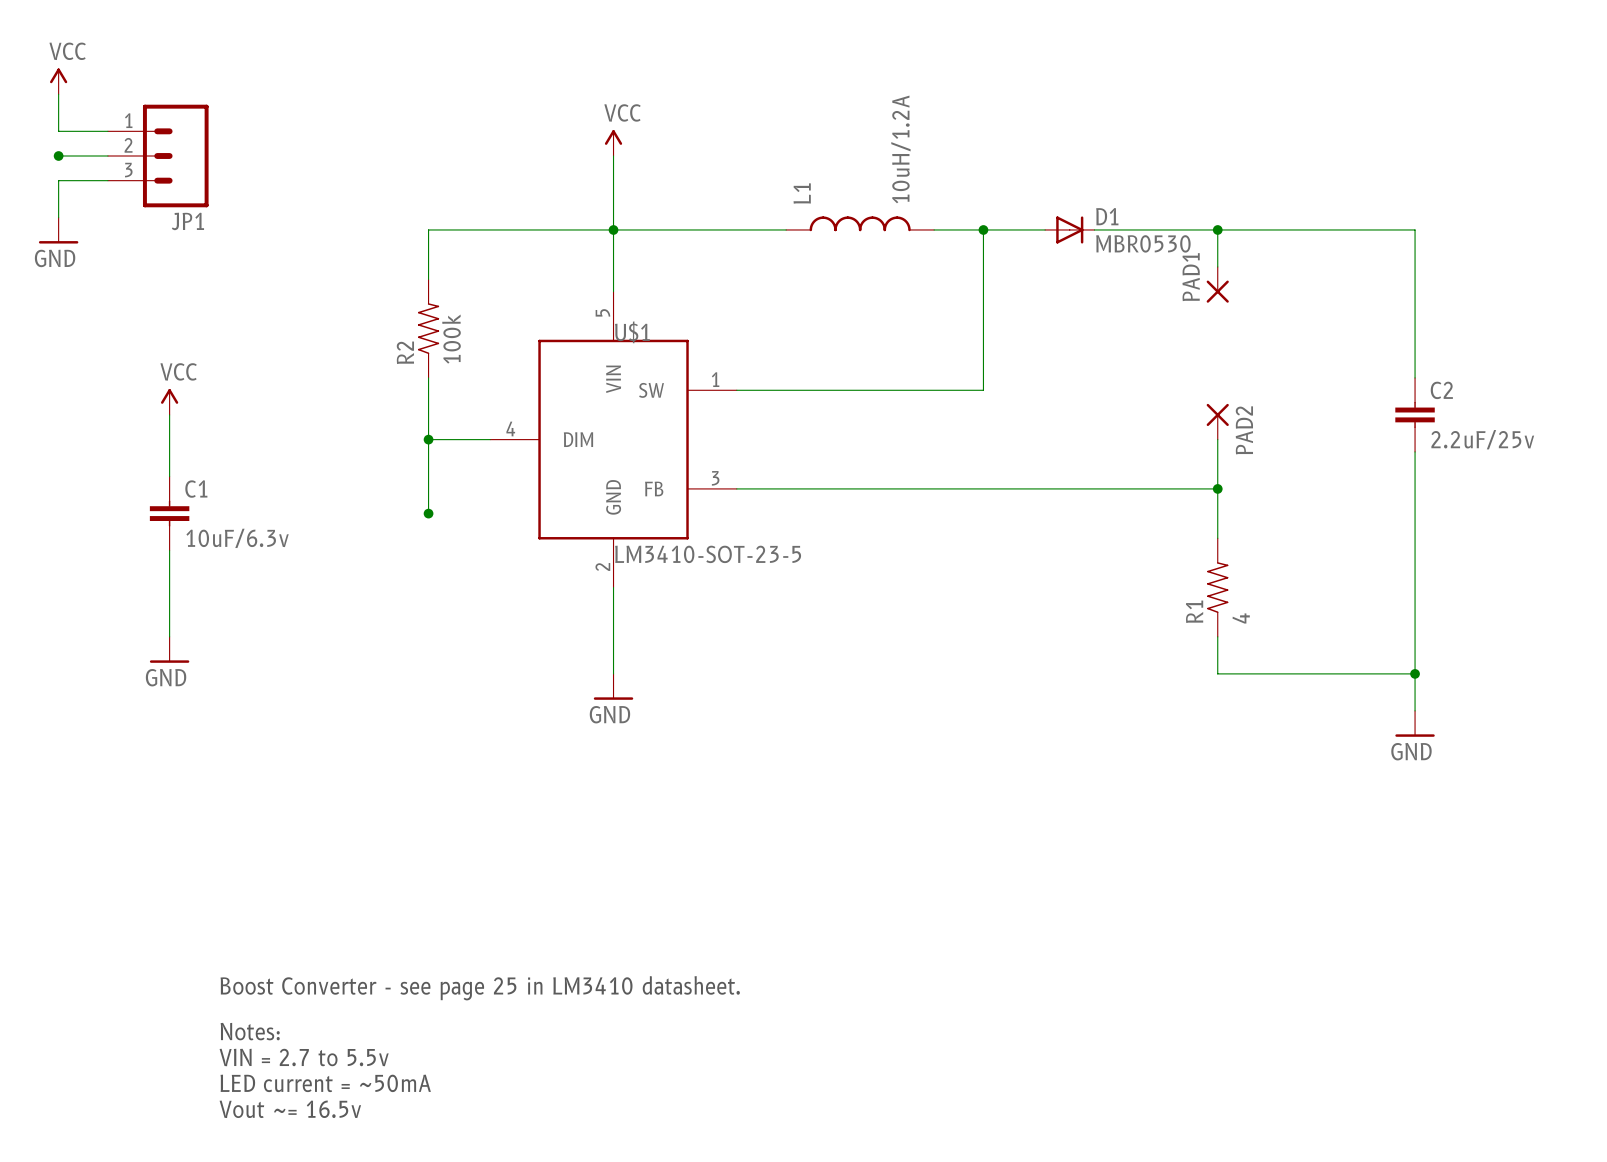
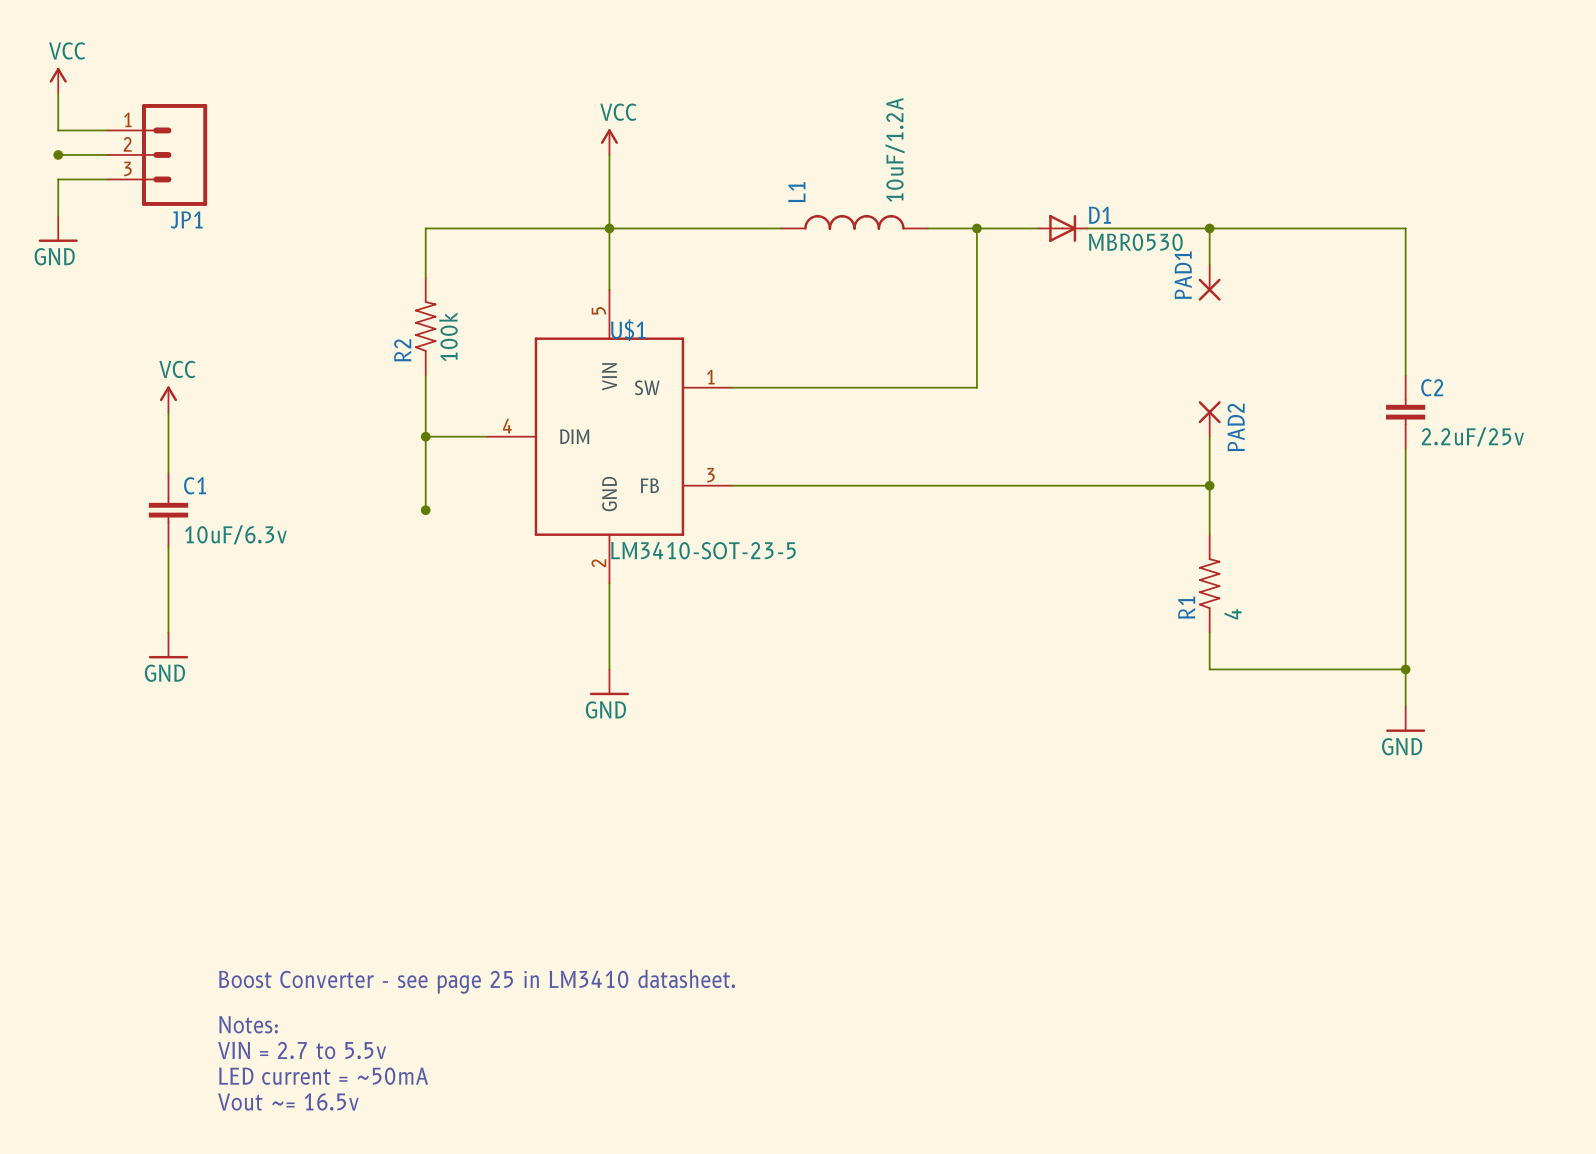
L1 value: 10uH/1.2A (900, 149) -> 10uF/1.2A (894, 149)

